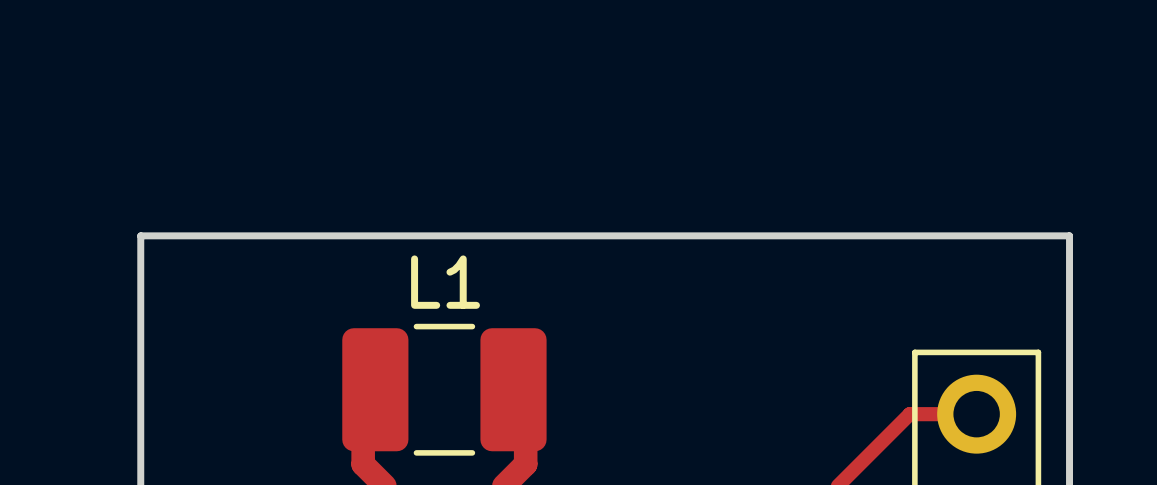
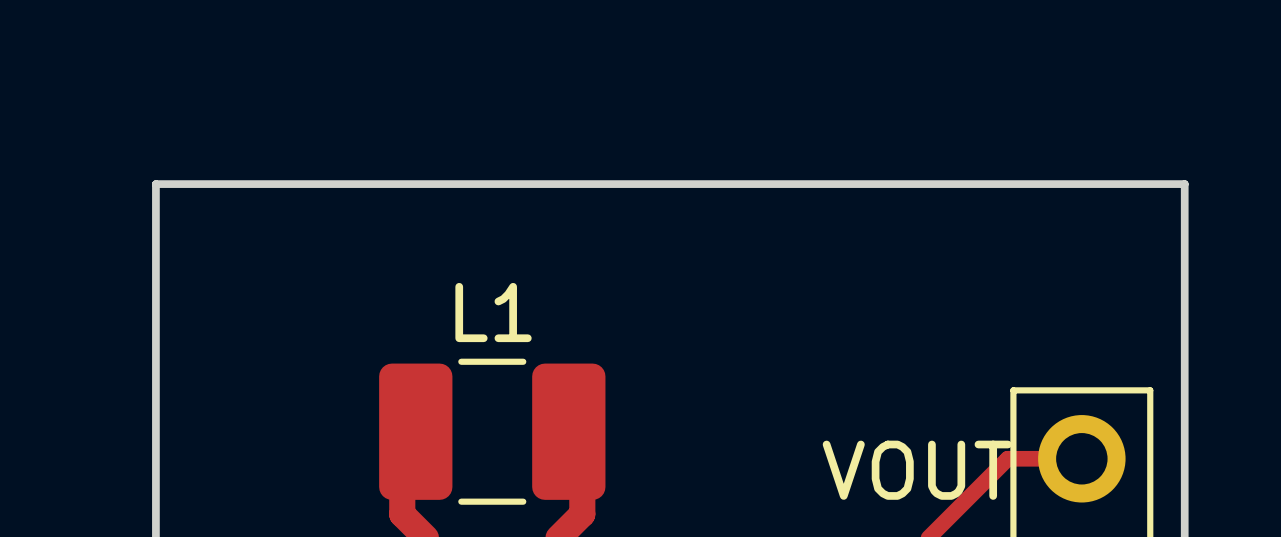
board edge: (140, 235) (1069, 235) -> (155, 261) (155, 184) (1184, 184) (1184, 261)
text: none -> VOUT (917, 470)

